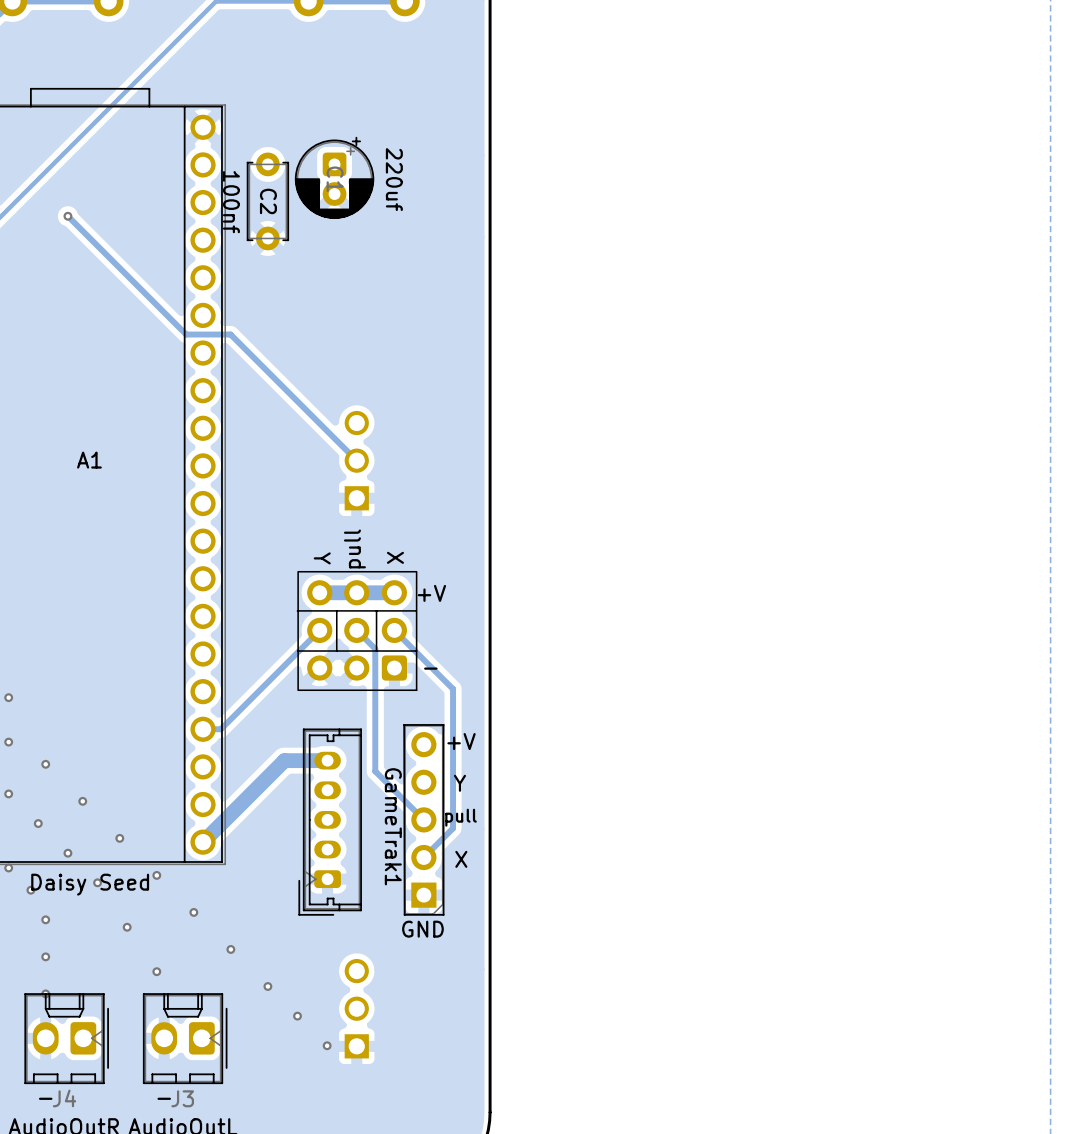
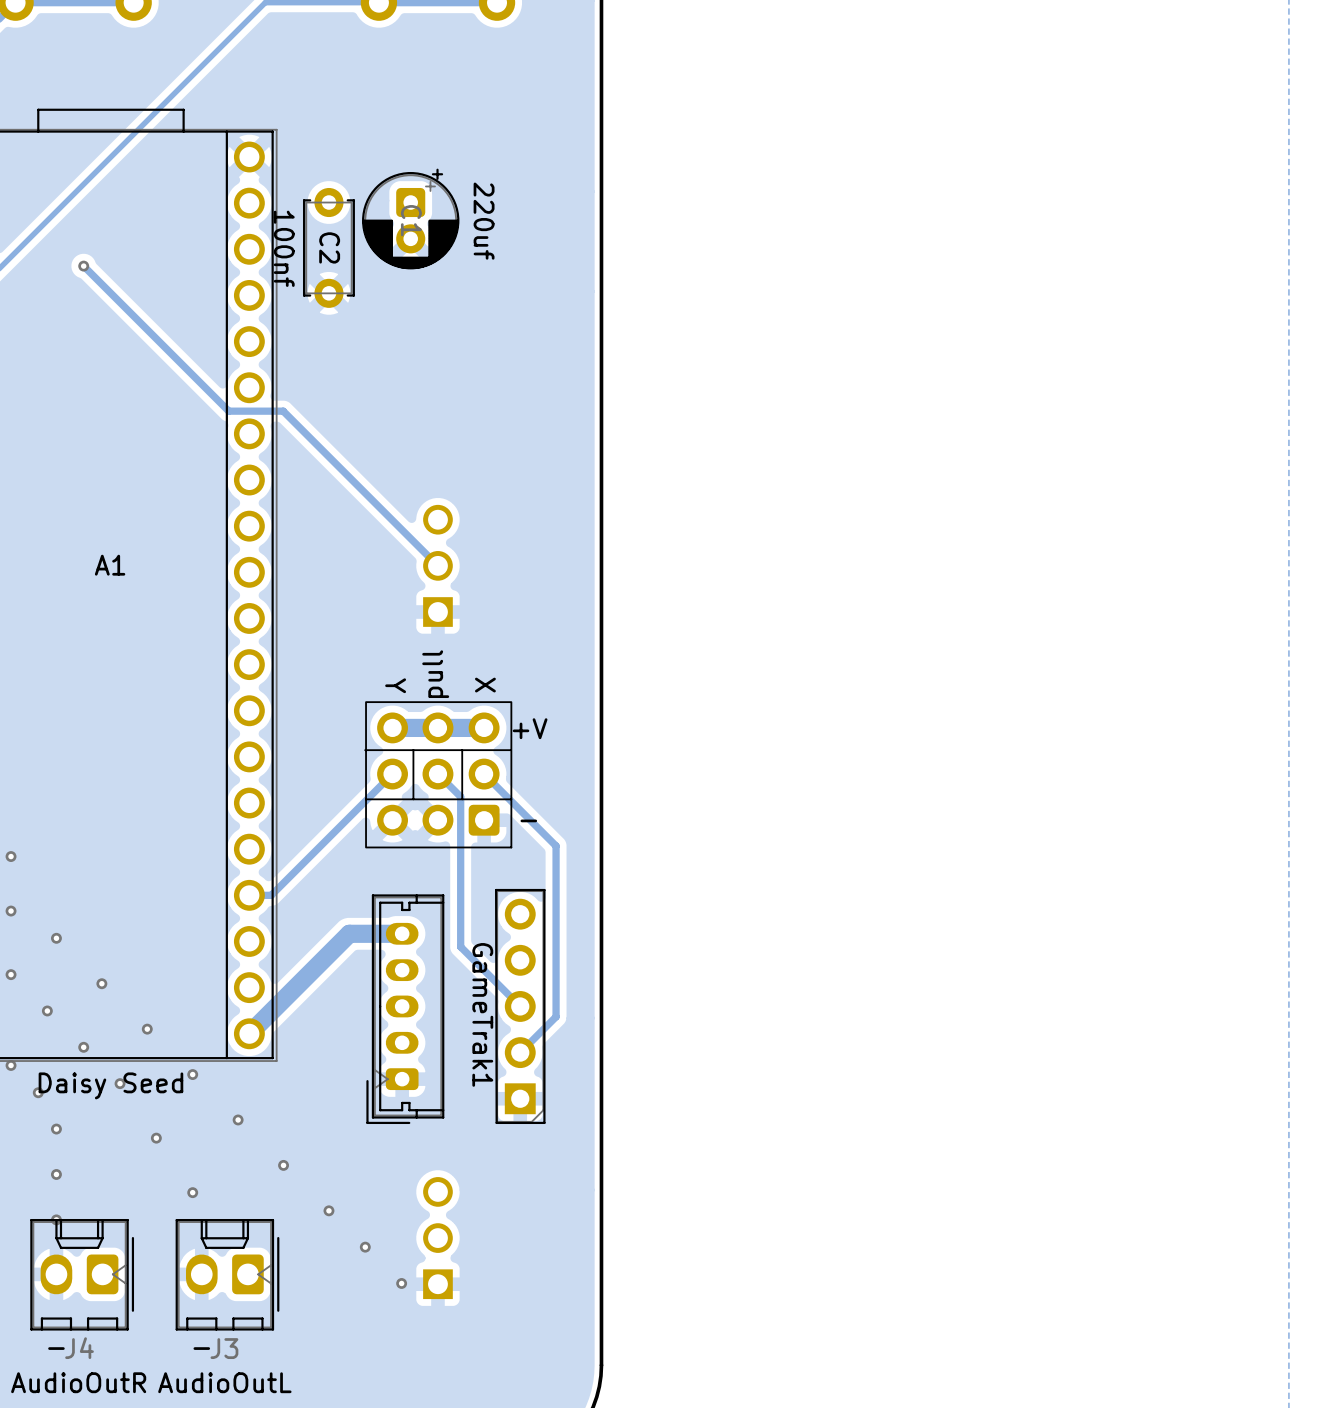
text: +V (461, 741) -> none
text: Y (459, 783) -> none
text: pull (461, 817) -> none
text: X (461, 859) -> none
text: GND (422, 929) -> none

